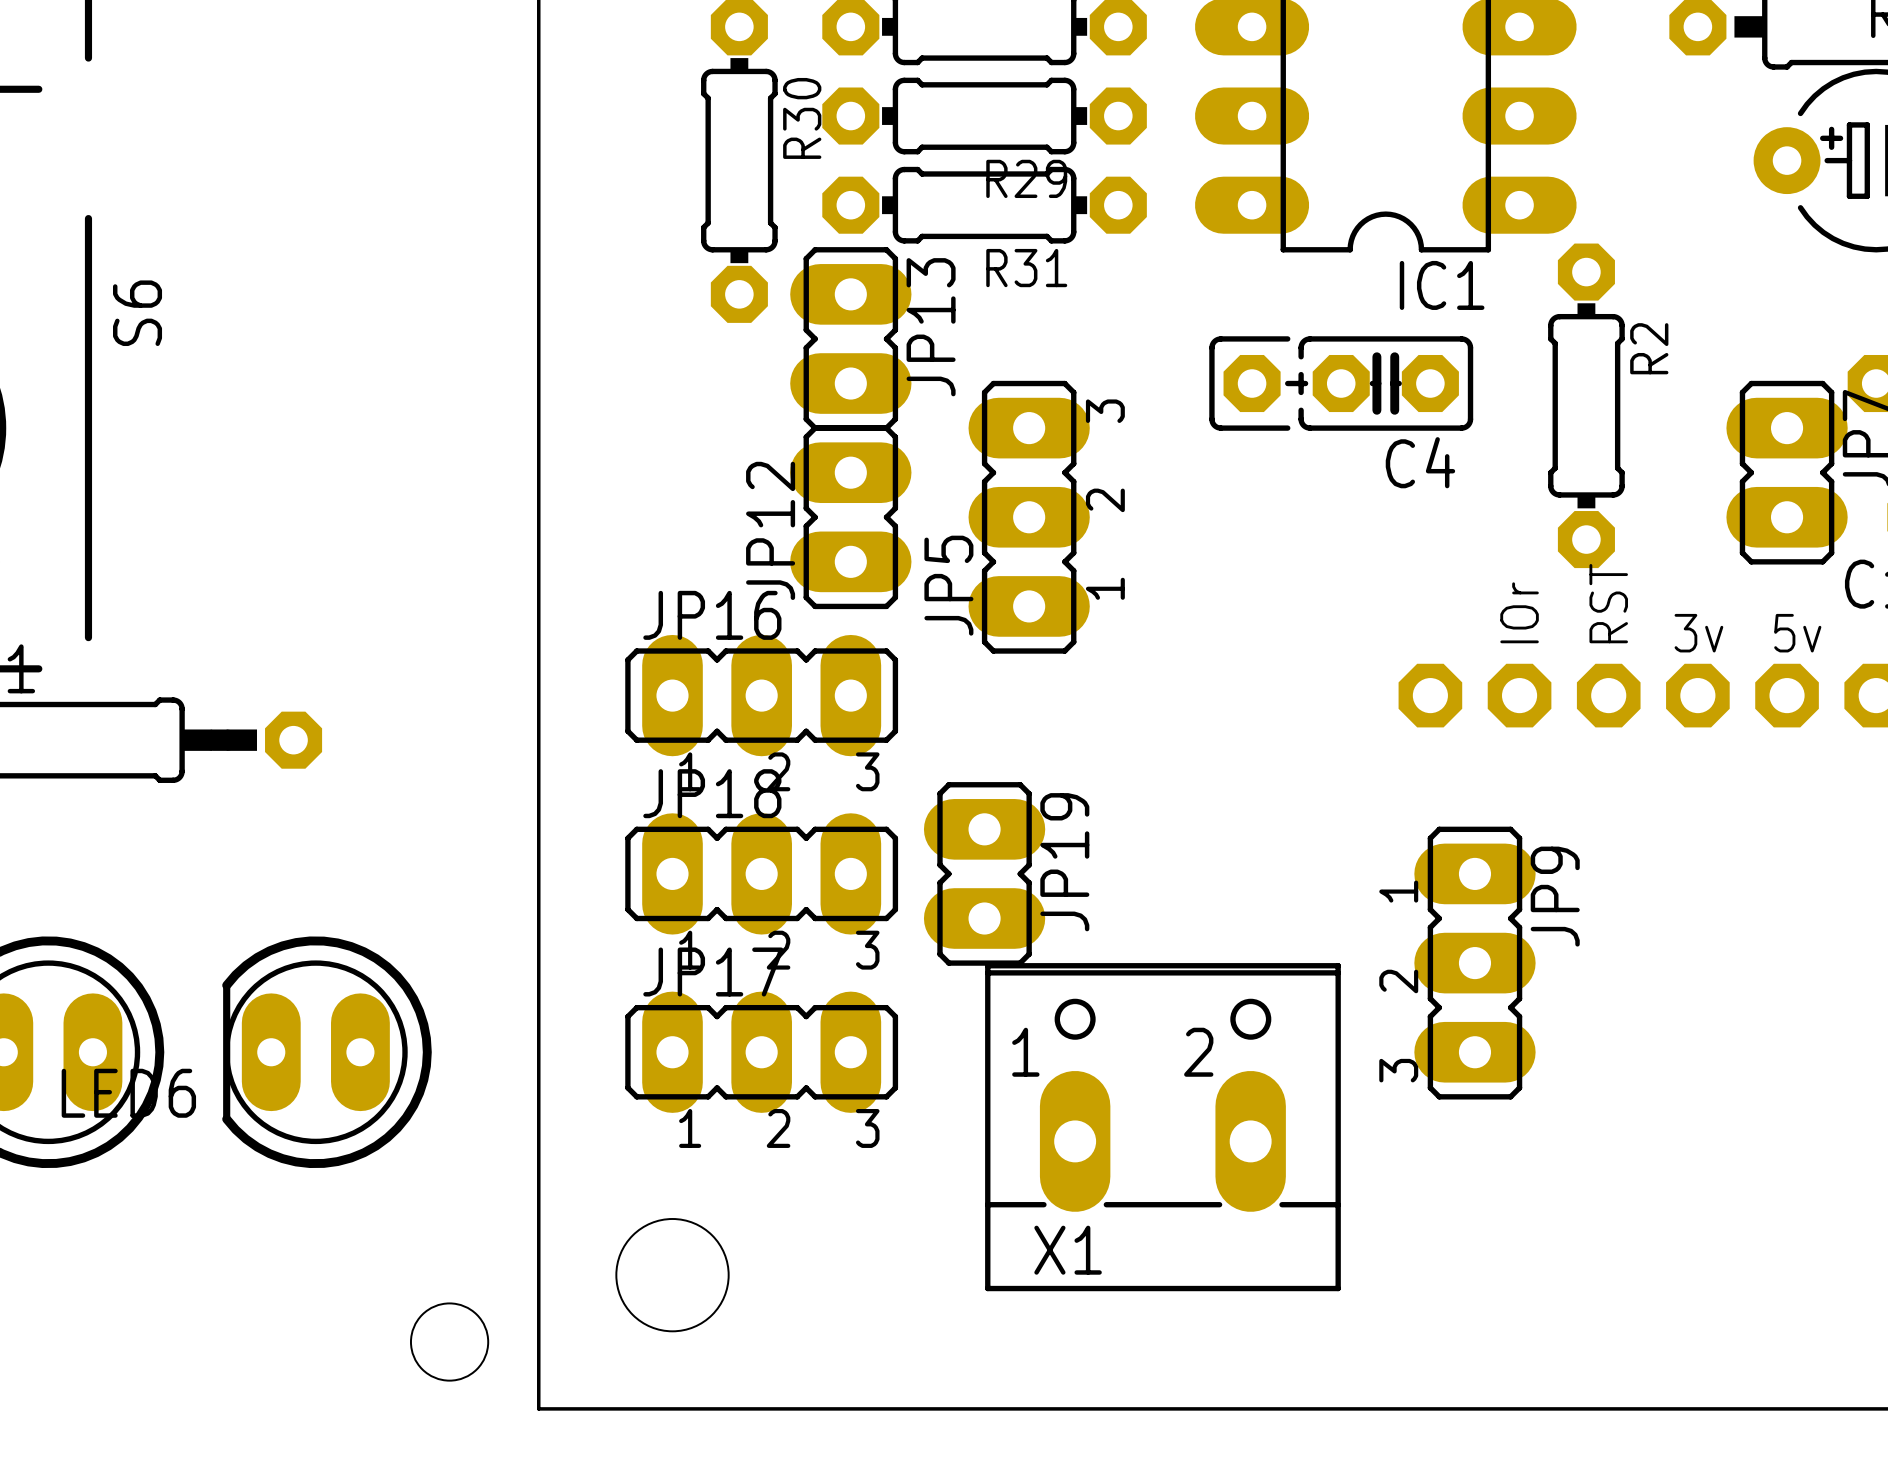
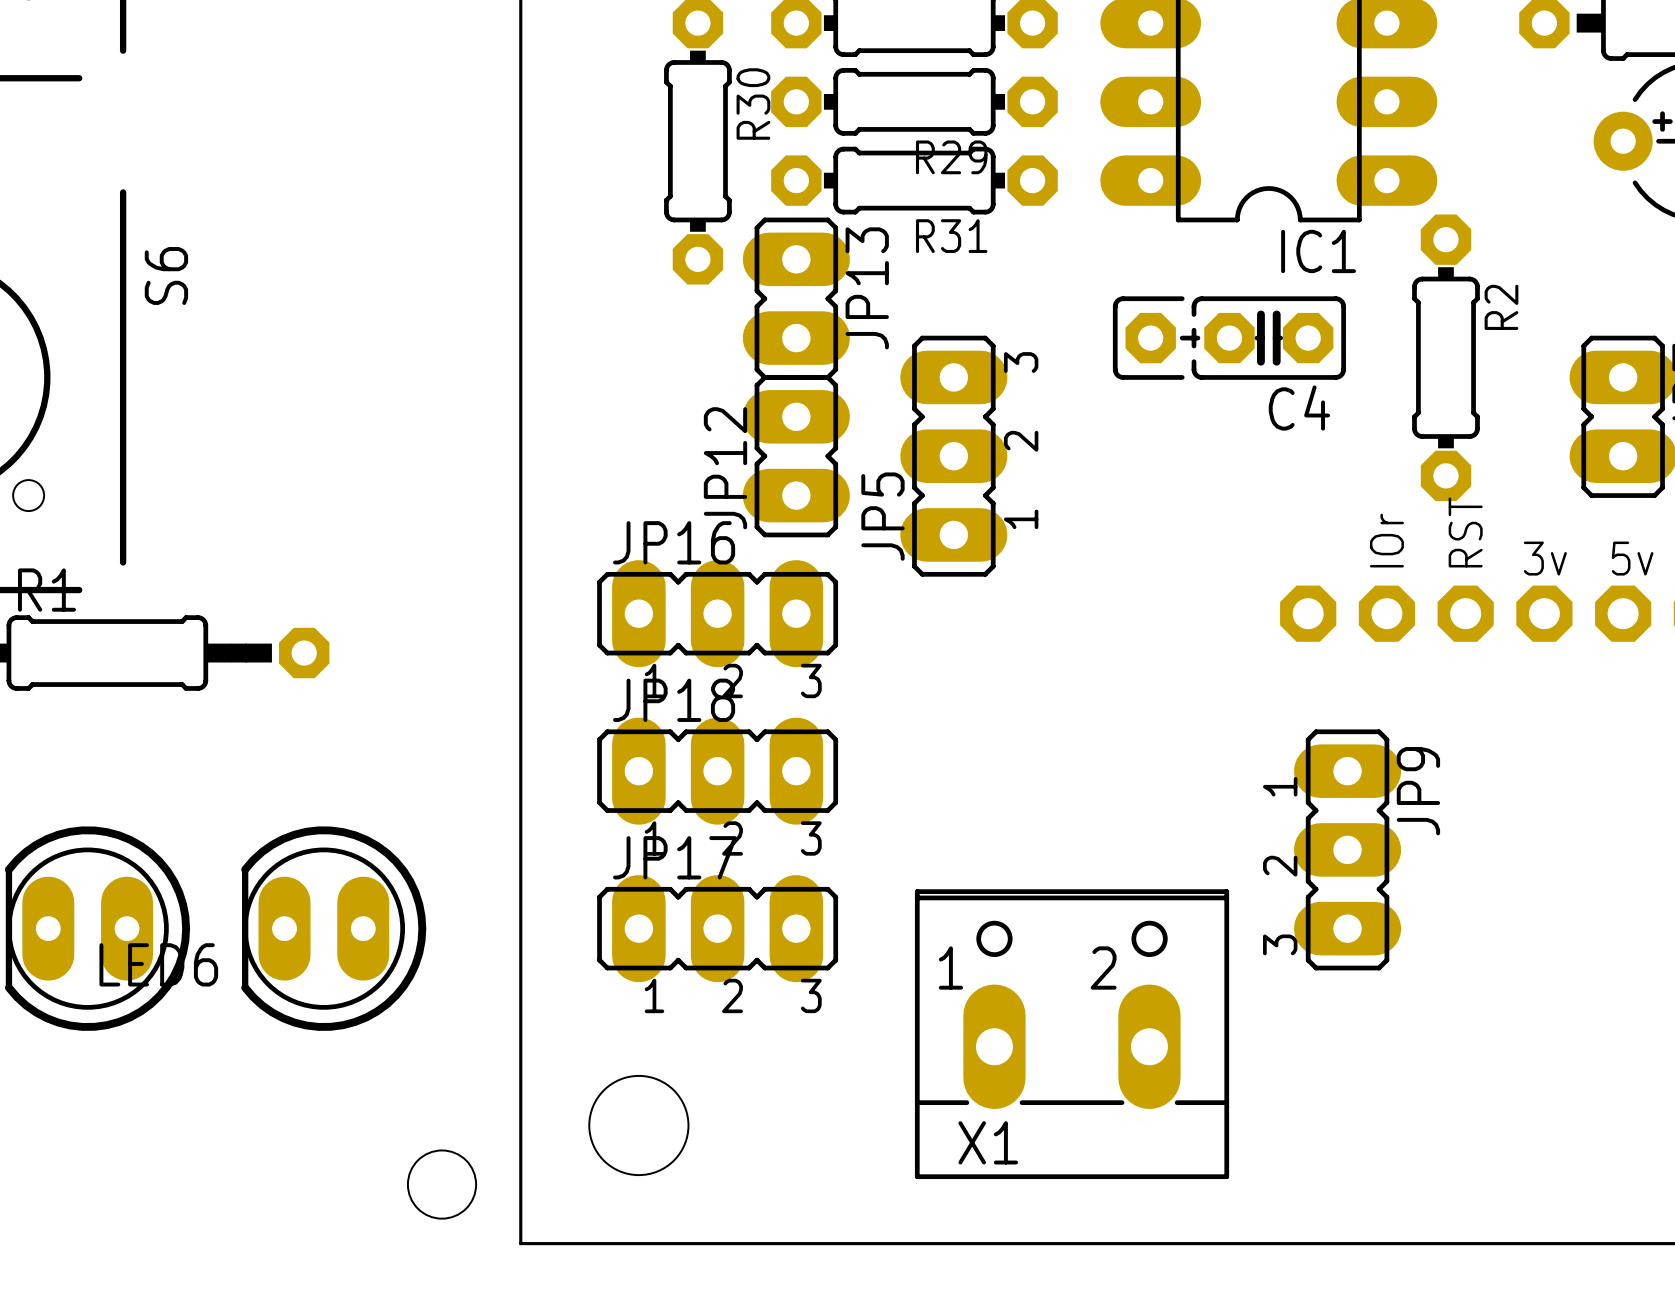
JP19: (984, 873) -> none
X1 position: (1162, 1127) -> (1072, 1034)

